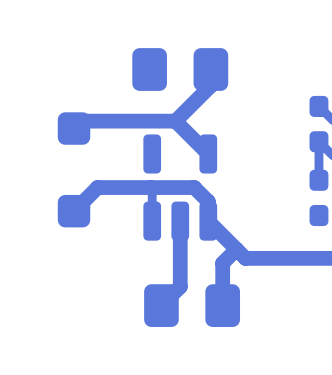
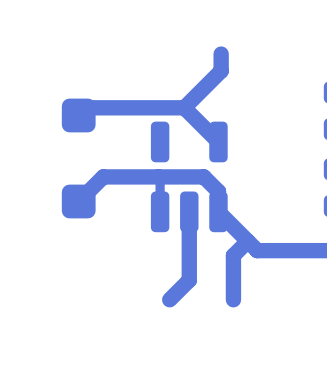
part: (180, 69) -> none
part: (192, 305) -> none

